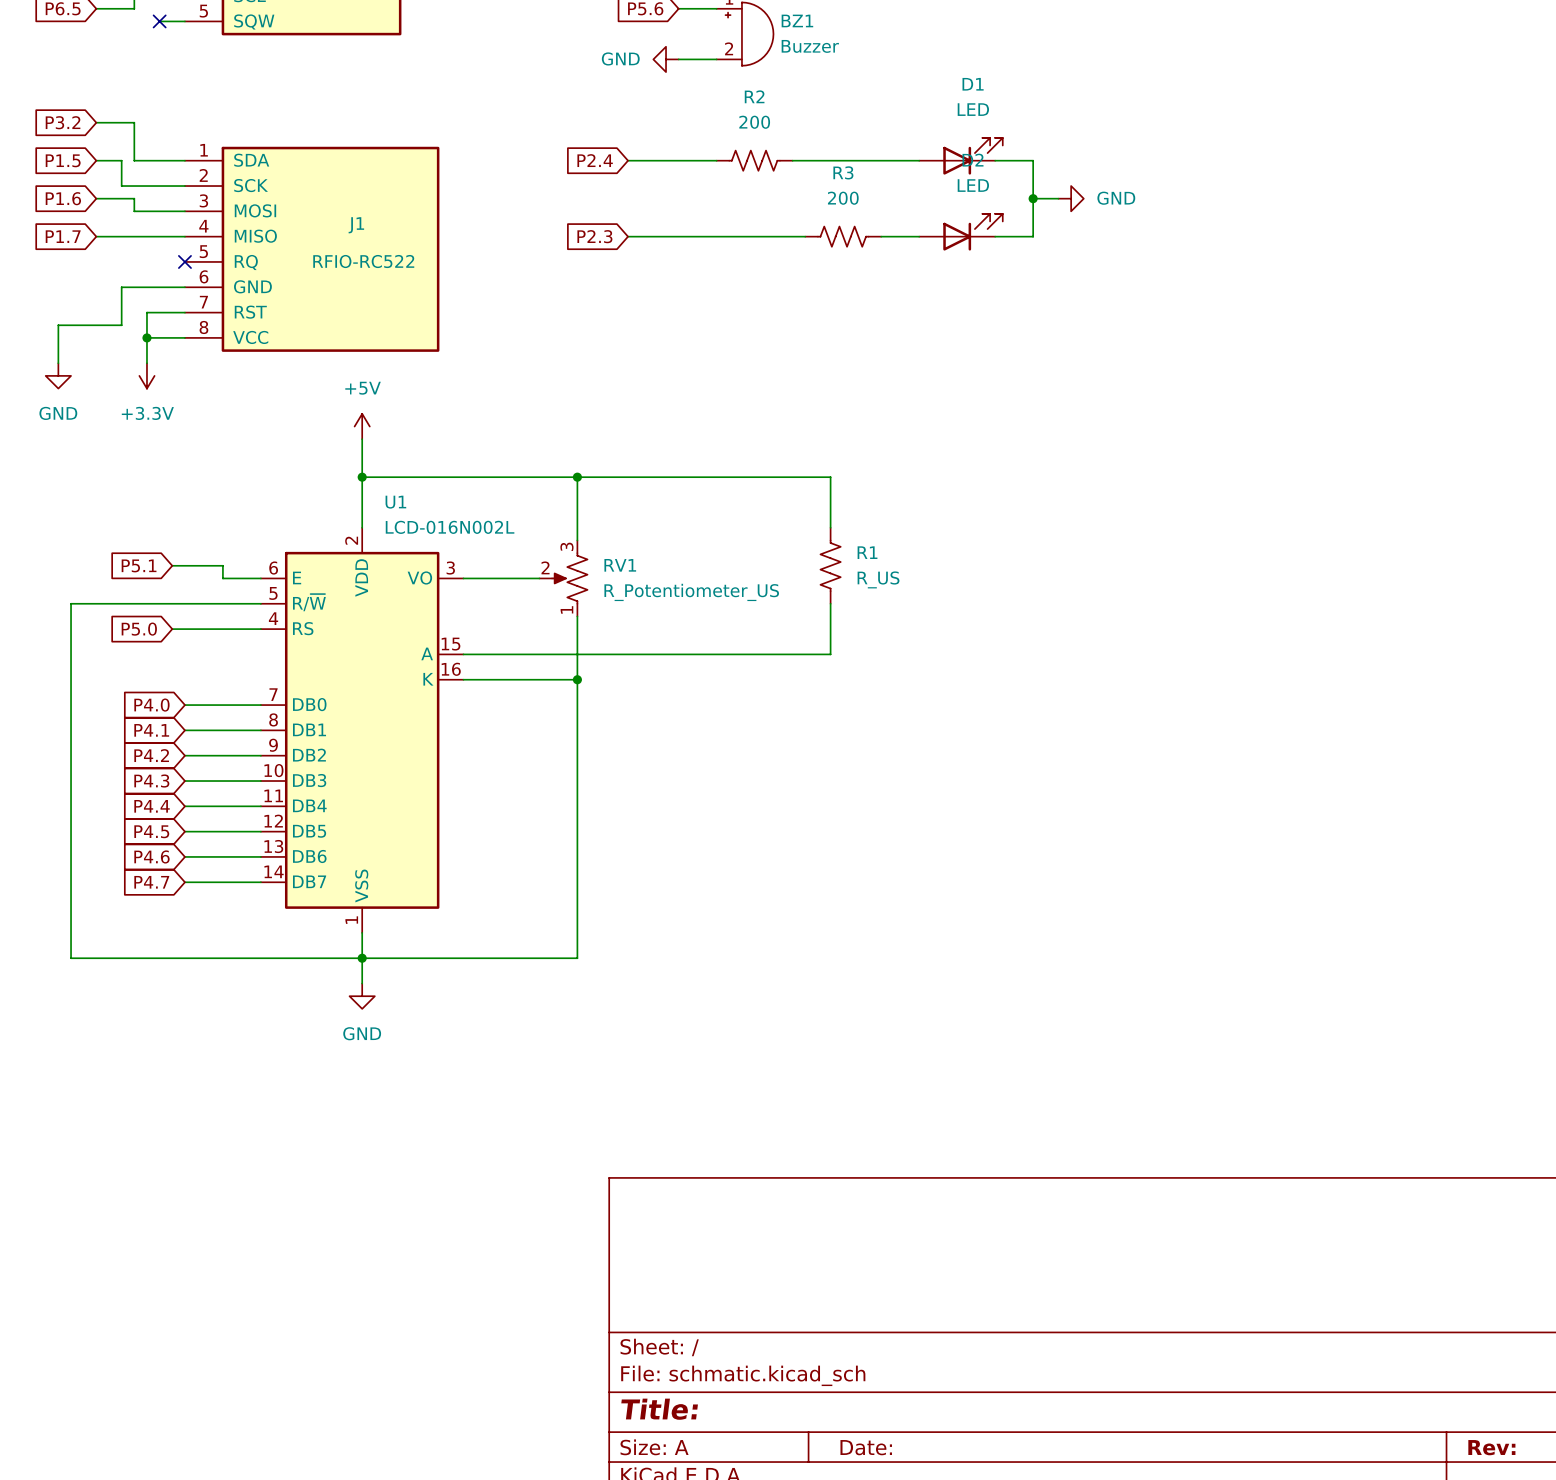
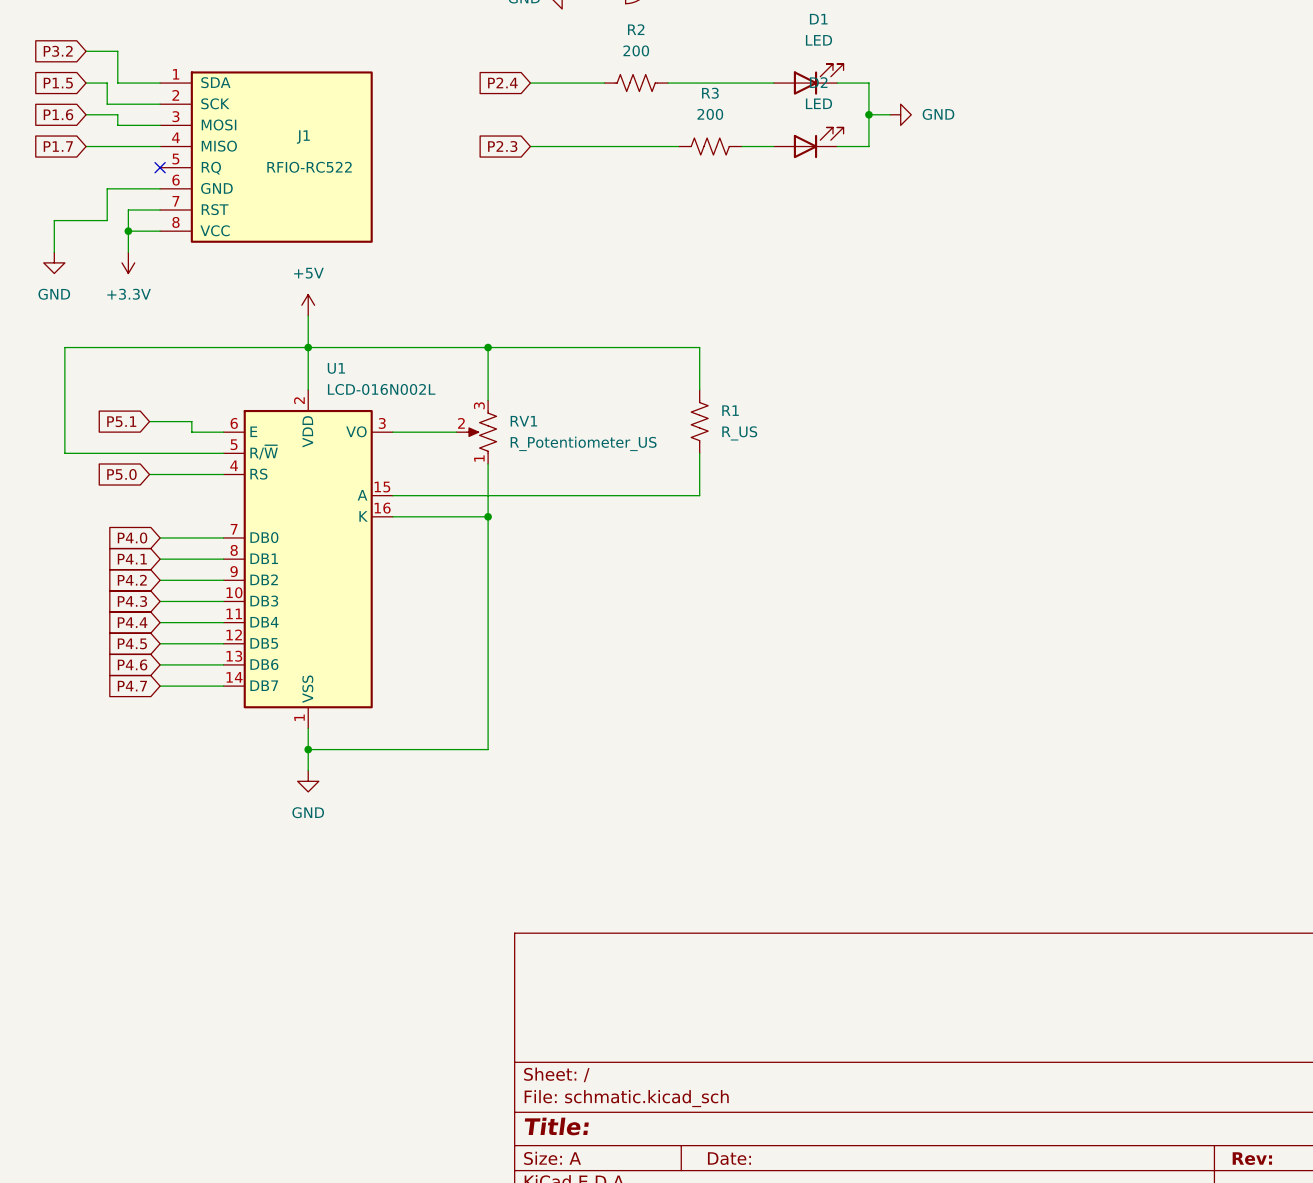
wire: (71, 603) (71, 958) (362, 958) -> (64, 453) (64, 347) (308, 347)

